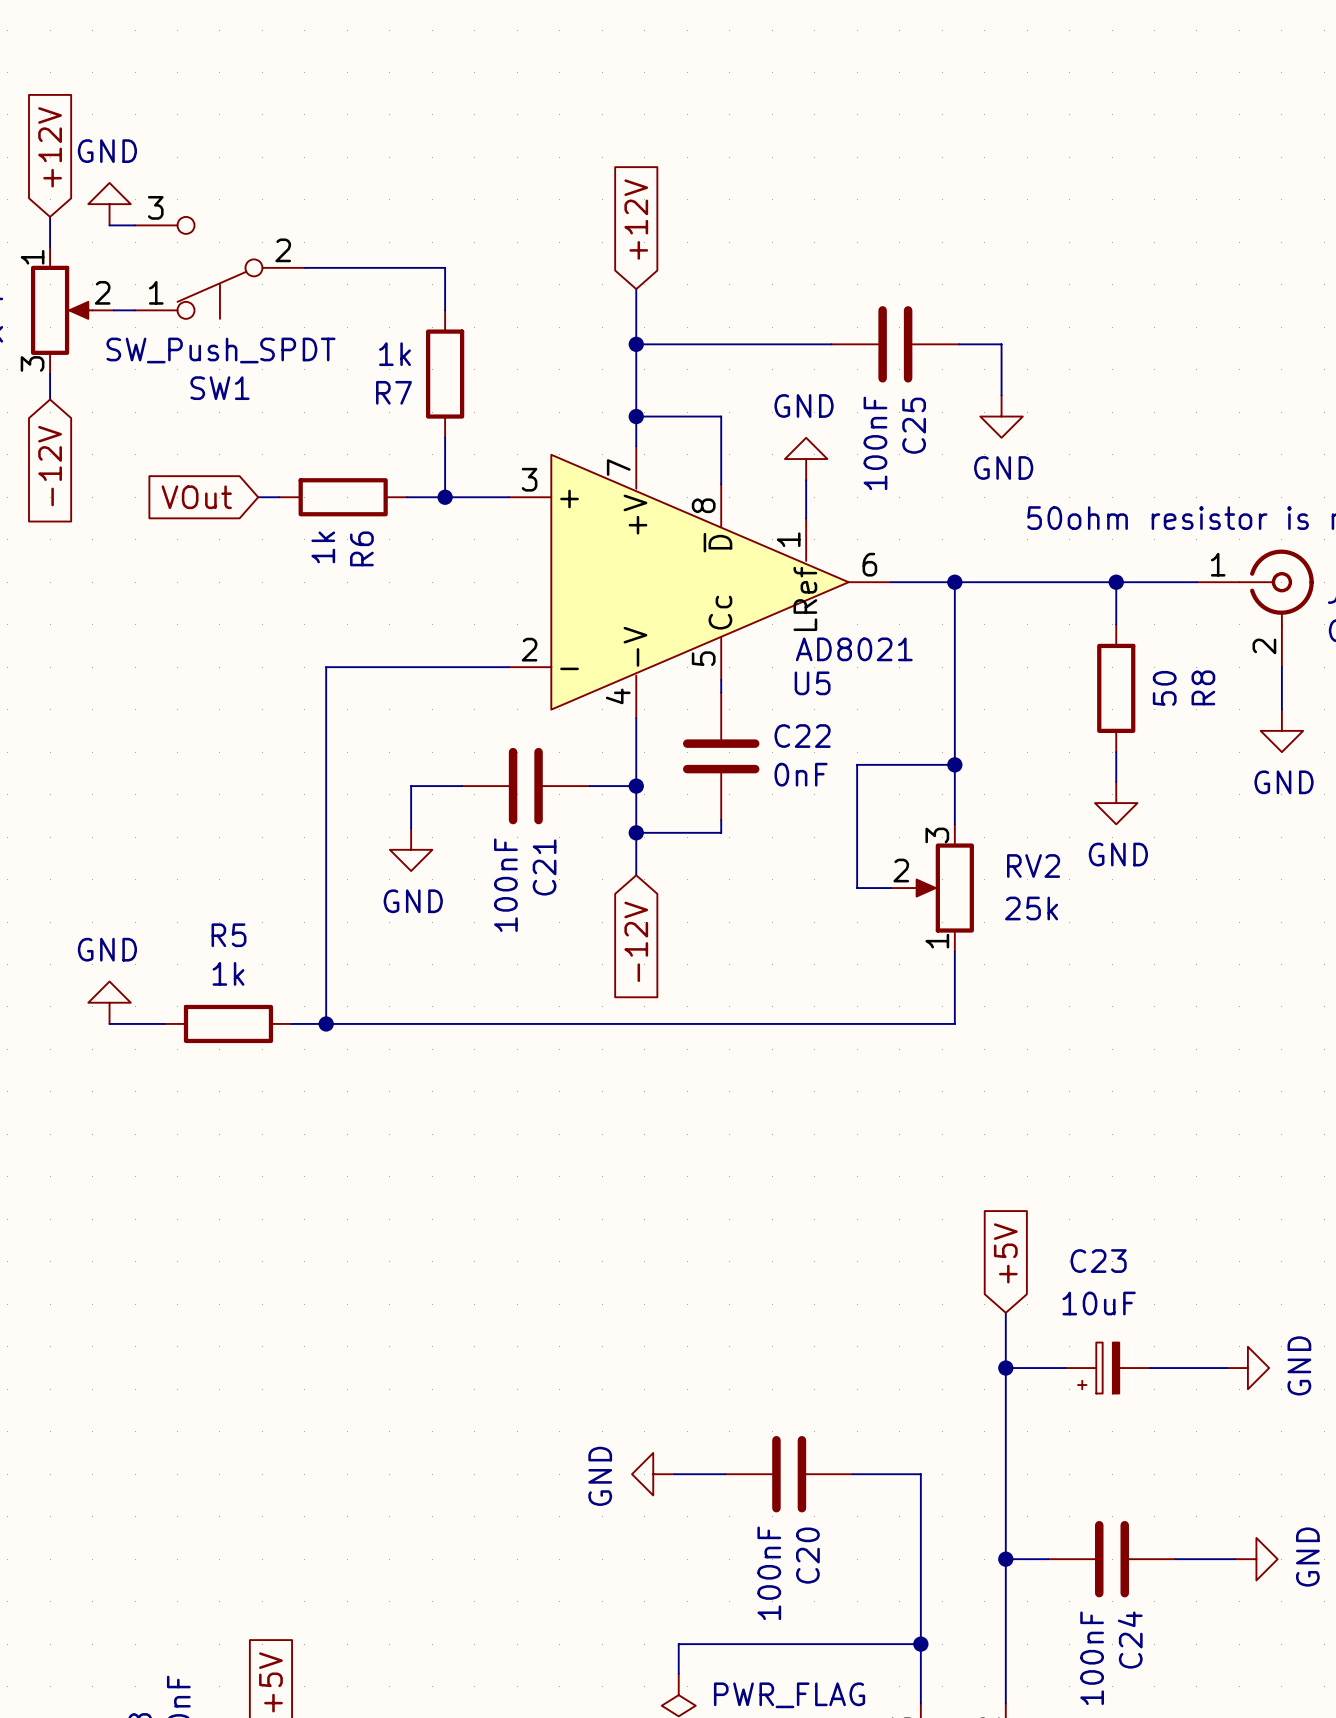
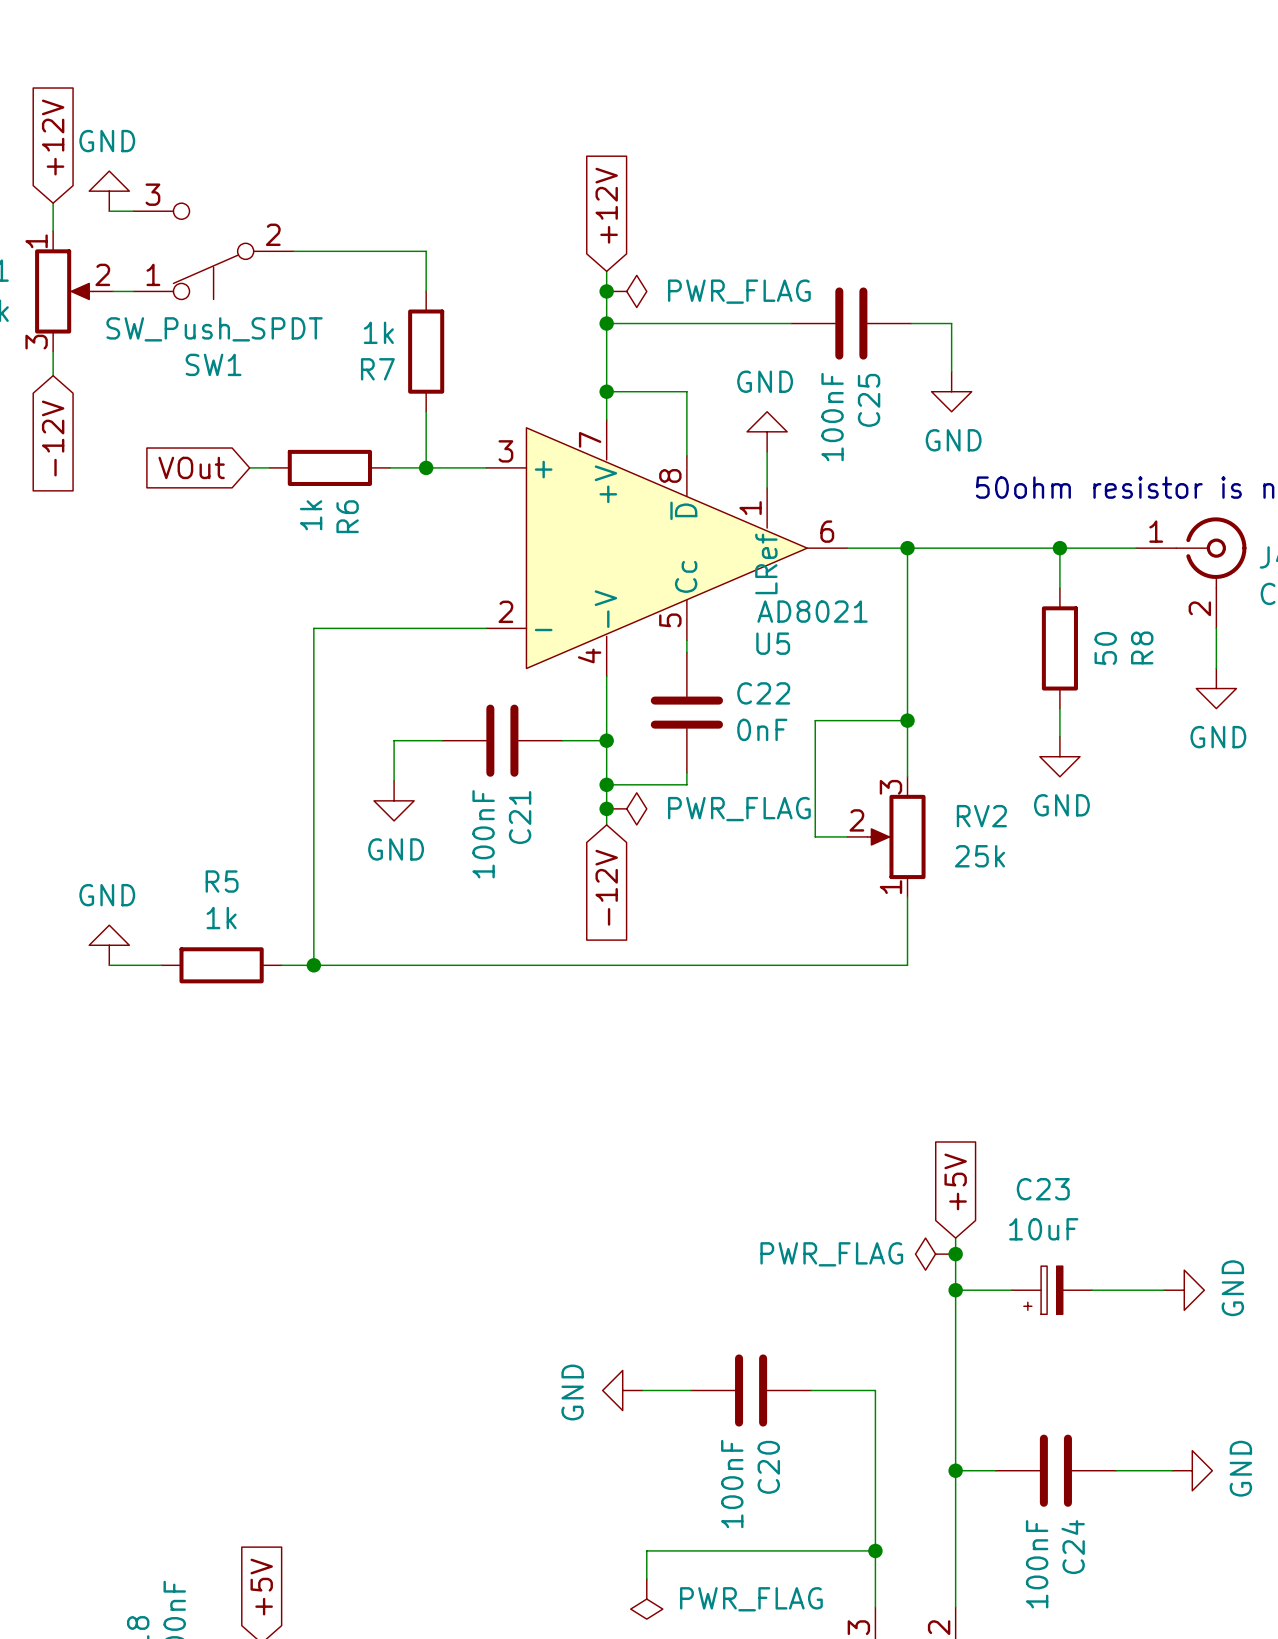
junction: none -> (606, 291)
power symbol: none -> PWR_FLAG (626, 291)
junction: none -> (606, 808)
power symbol: none -> PWR_FLAG (626, 808)
power symbol: none -> PWR_FLAG (935, 1254)
junction: none -> (955, 1254)

